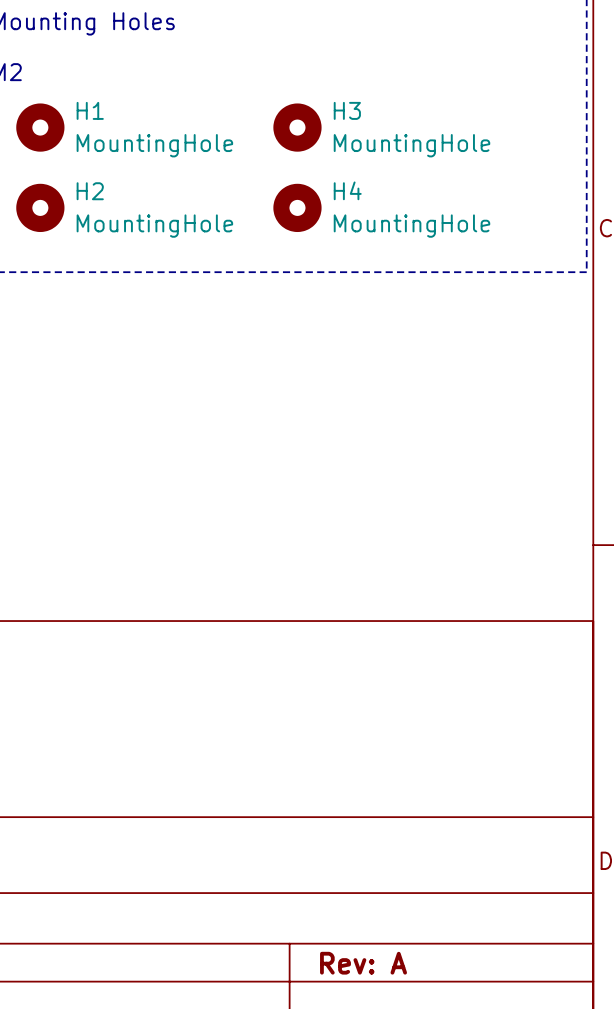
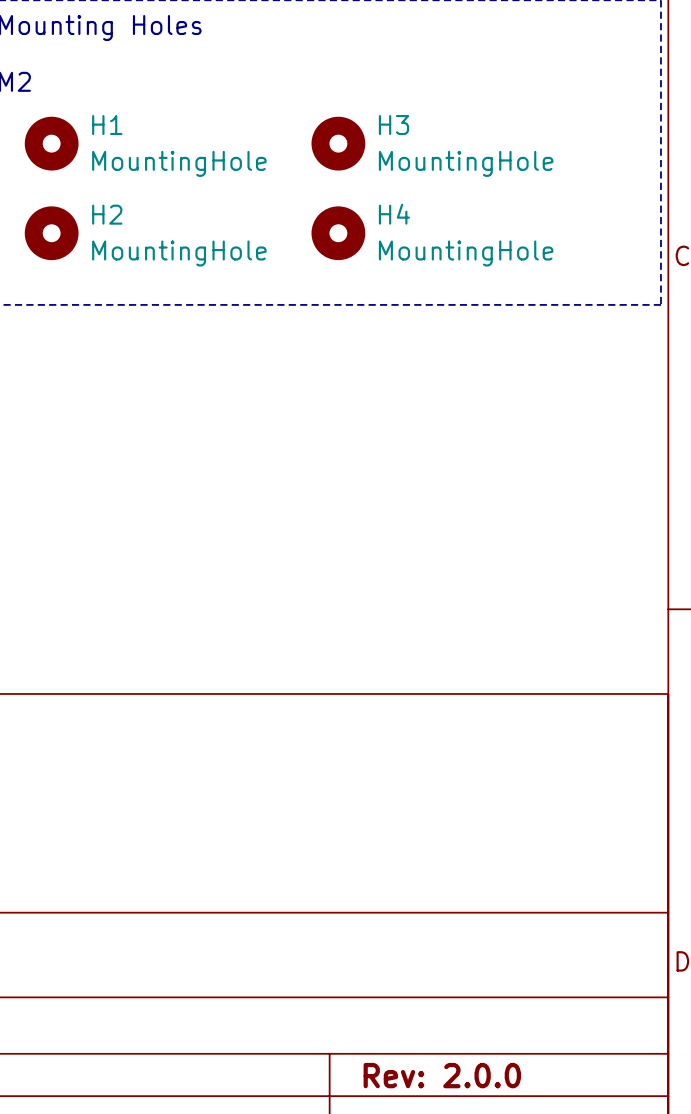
title block: Rev: A (363, 963) -> Rev: 2.0.0 (442, 1075)

